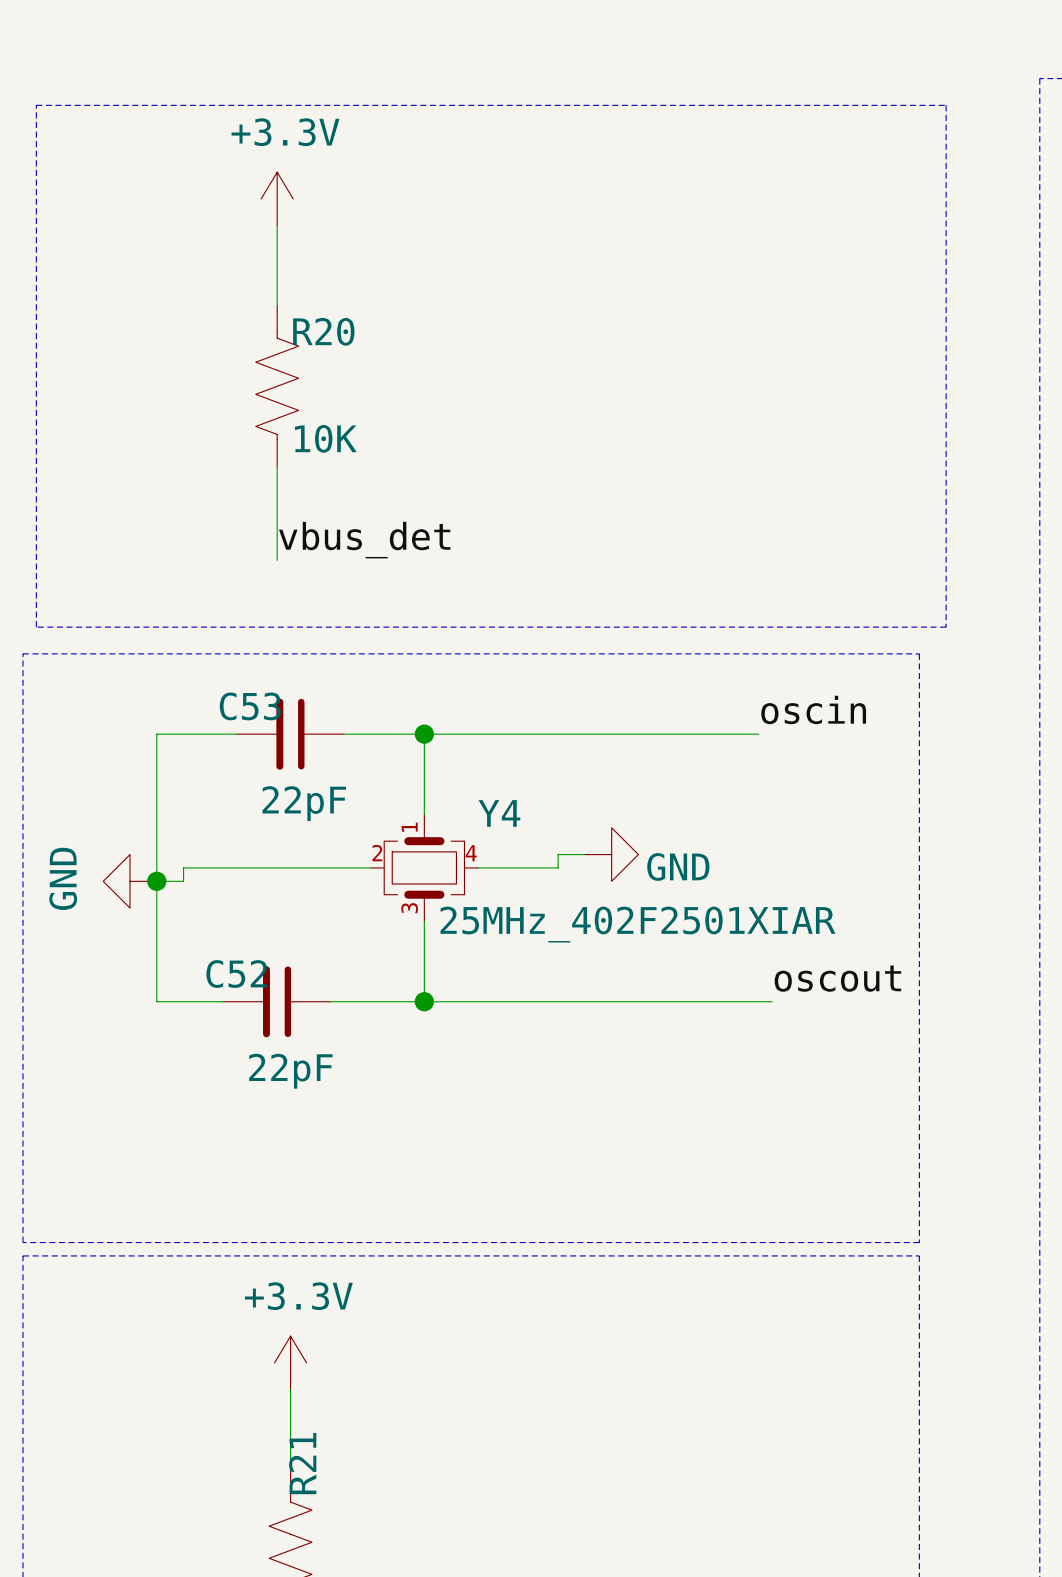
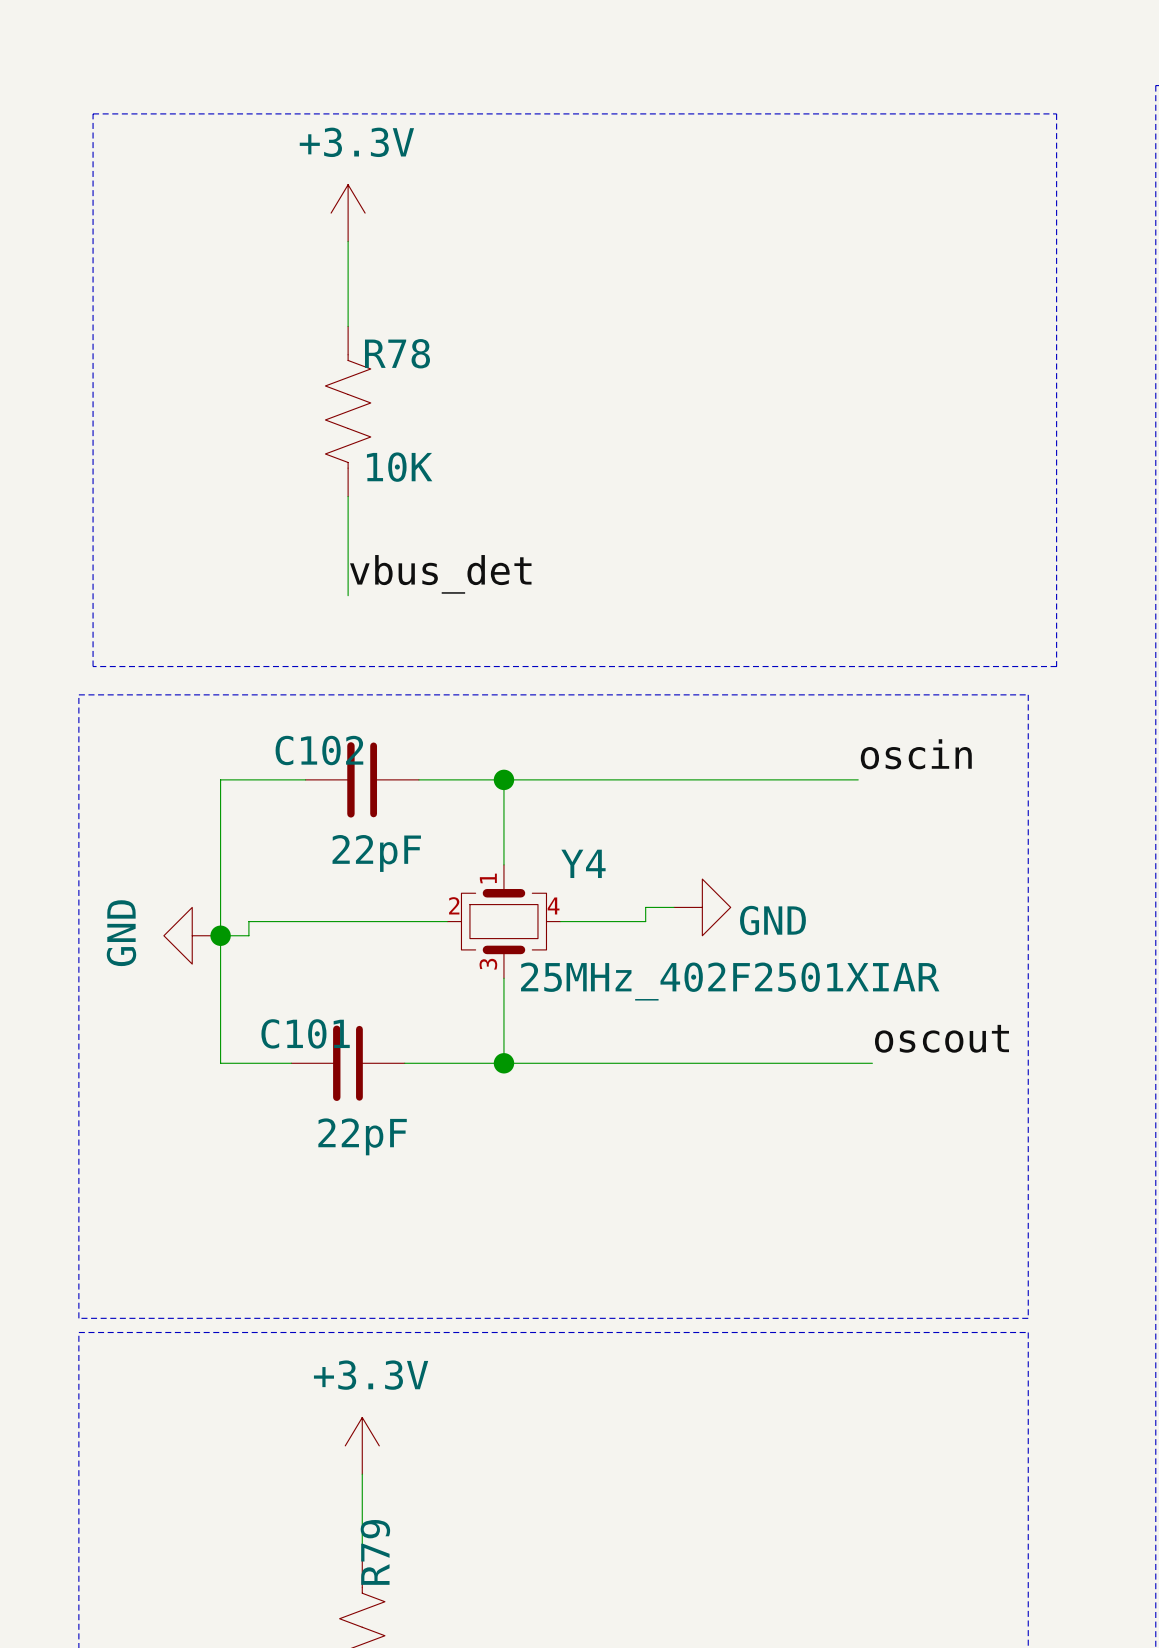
R20 name: R20 (323, 331) -> R78 (397, 353)
C53 name: C53 (250, 706) -> C102 (319, 750)
C52 name: C52 (236, 974) -> C101 (305, 1033)
R21 name: R21 (302, 1463) -> R79 (375, 1552)

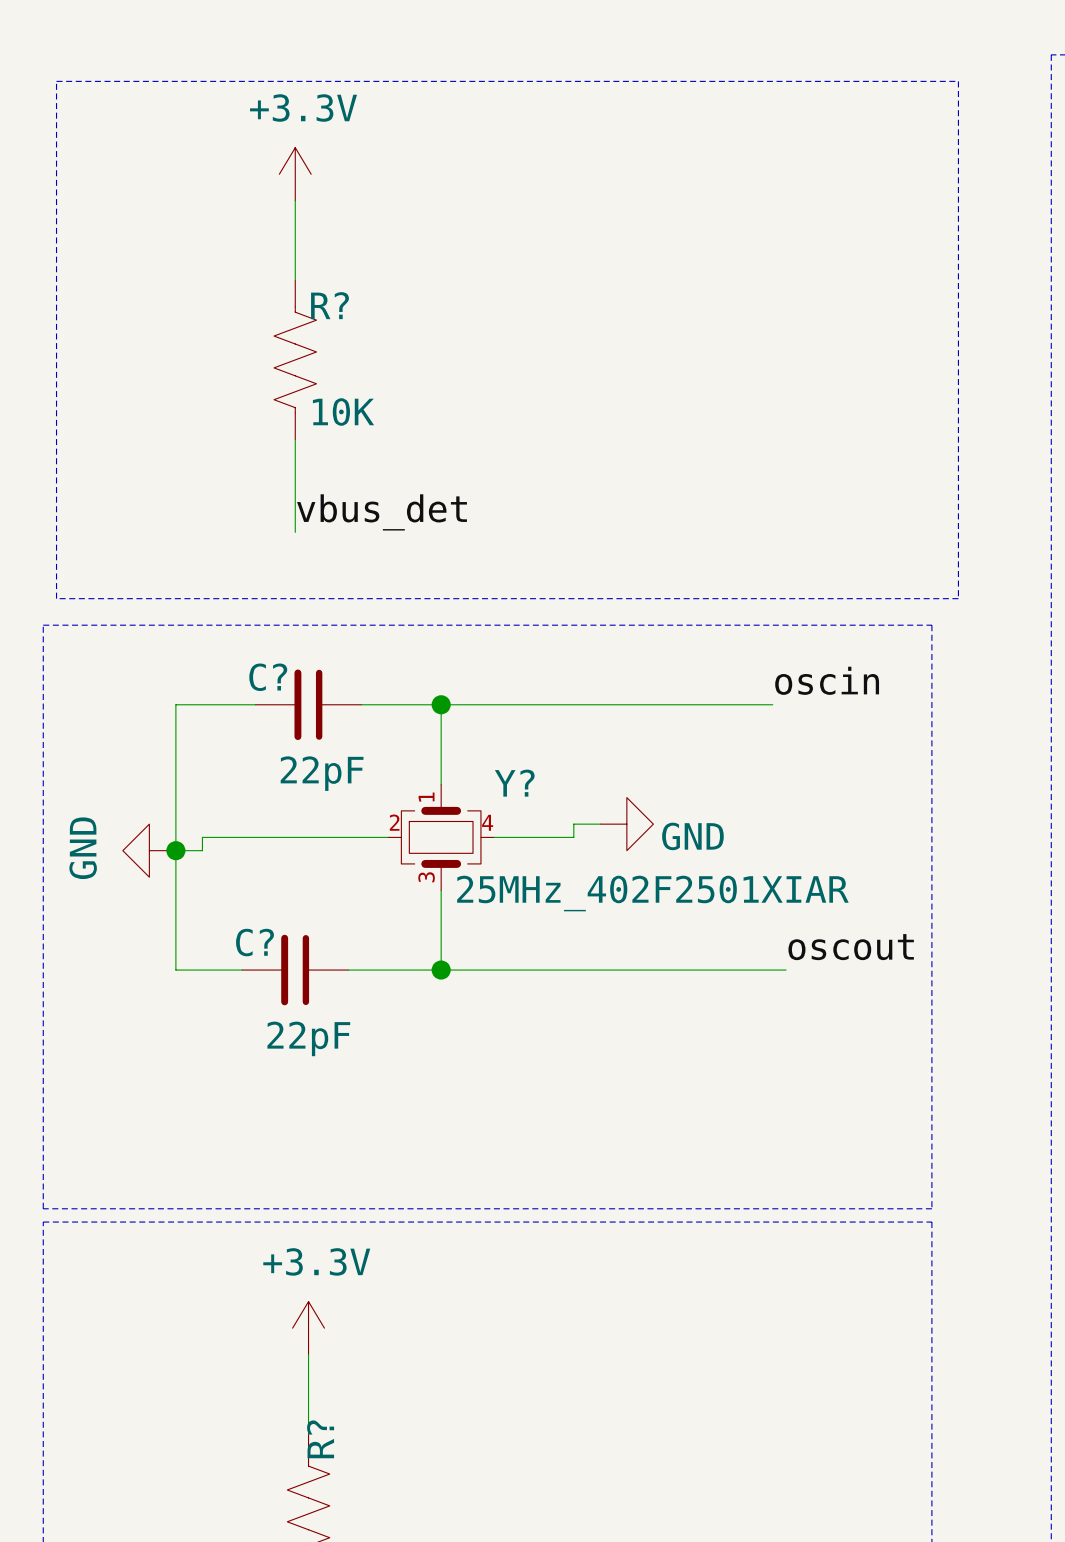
R78 name: R78 (397, 353) -> R? (330, 305)
C102 name: C102 (319, 750) -> C? (268, 677)
Y4 name: Y4 (583, 863) -> Y? (514, 783)
C101 name: C101 (305, 1033) -> C? (255, 942)
R79 name: R79 (375, 1552) -> R? (320, 1439)

